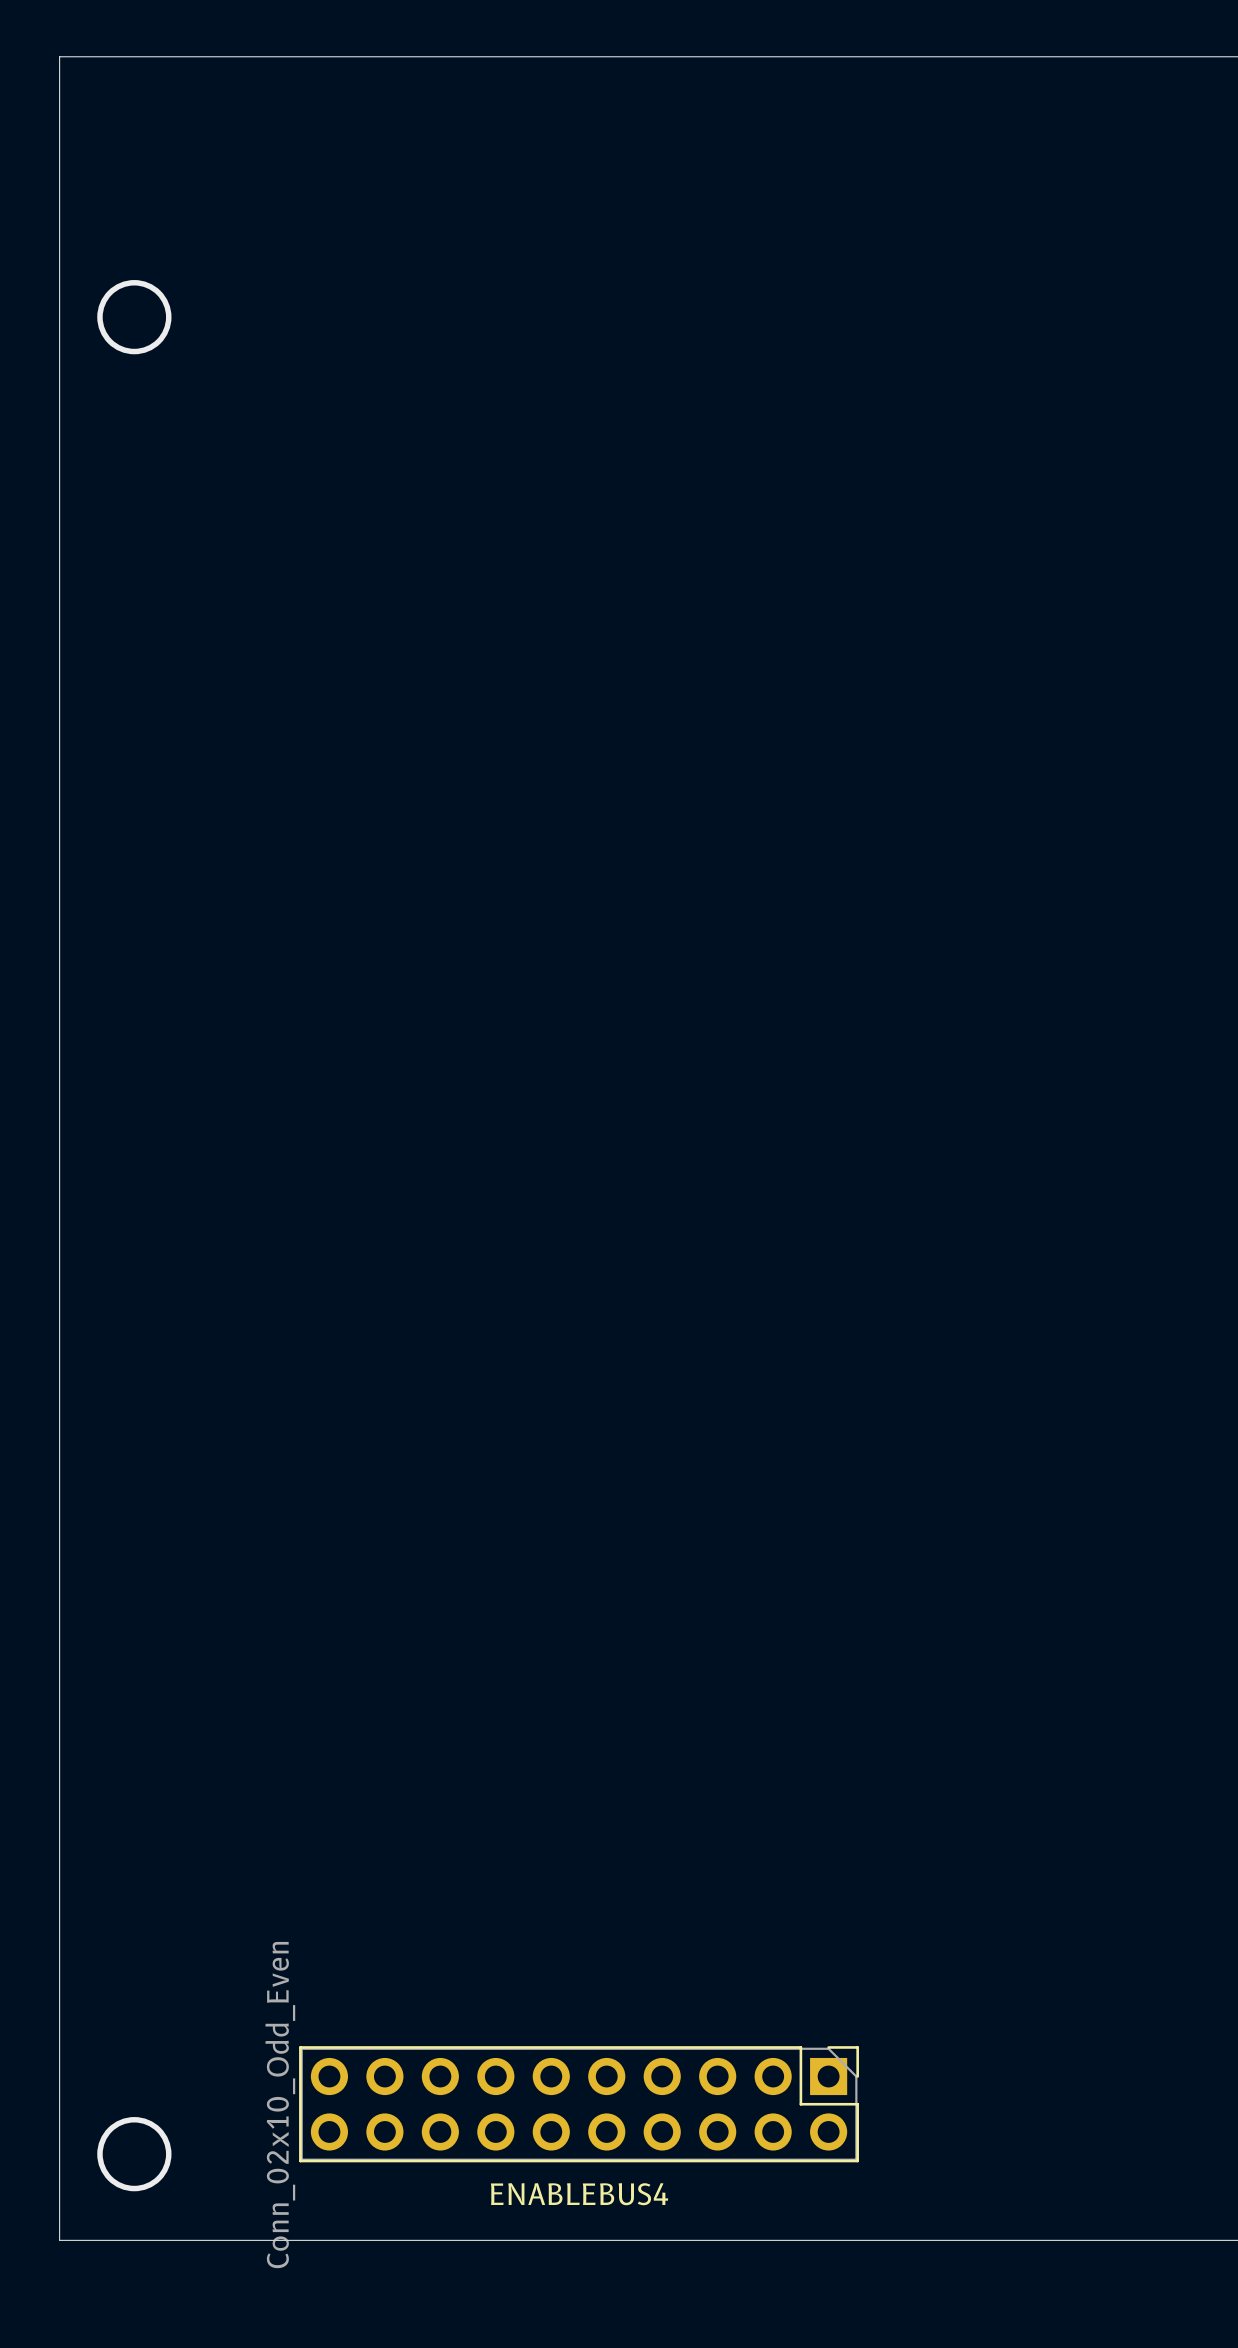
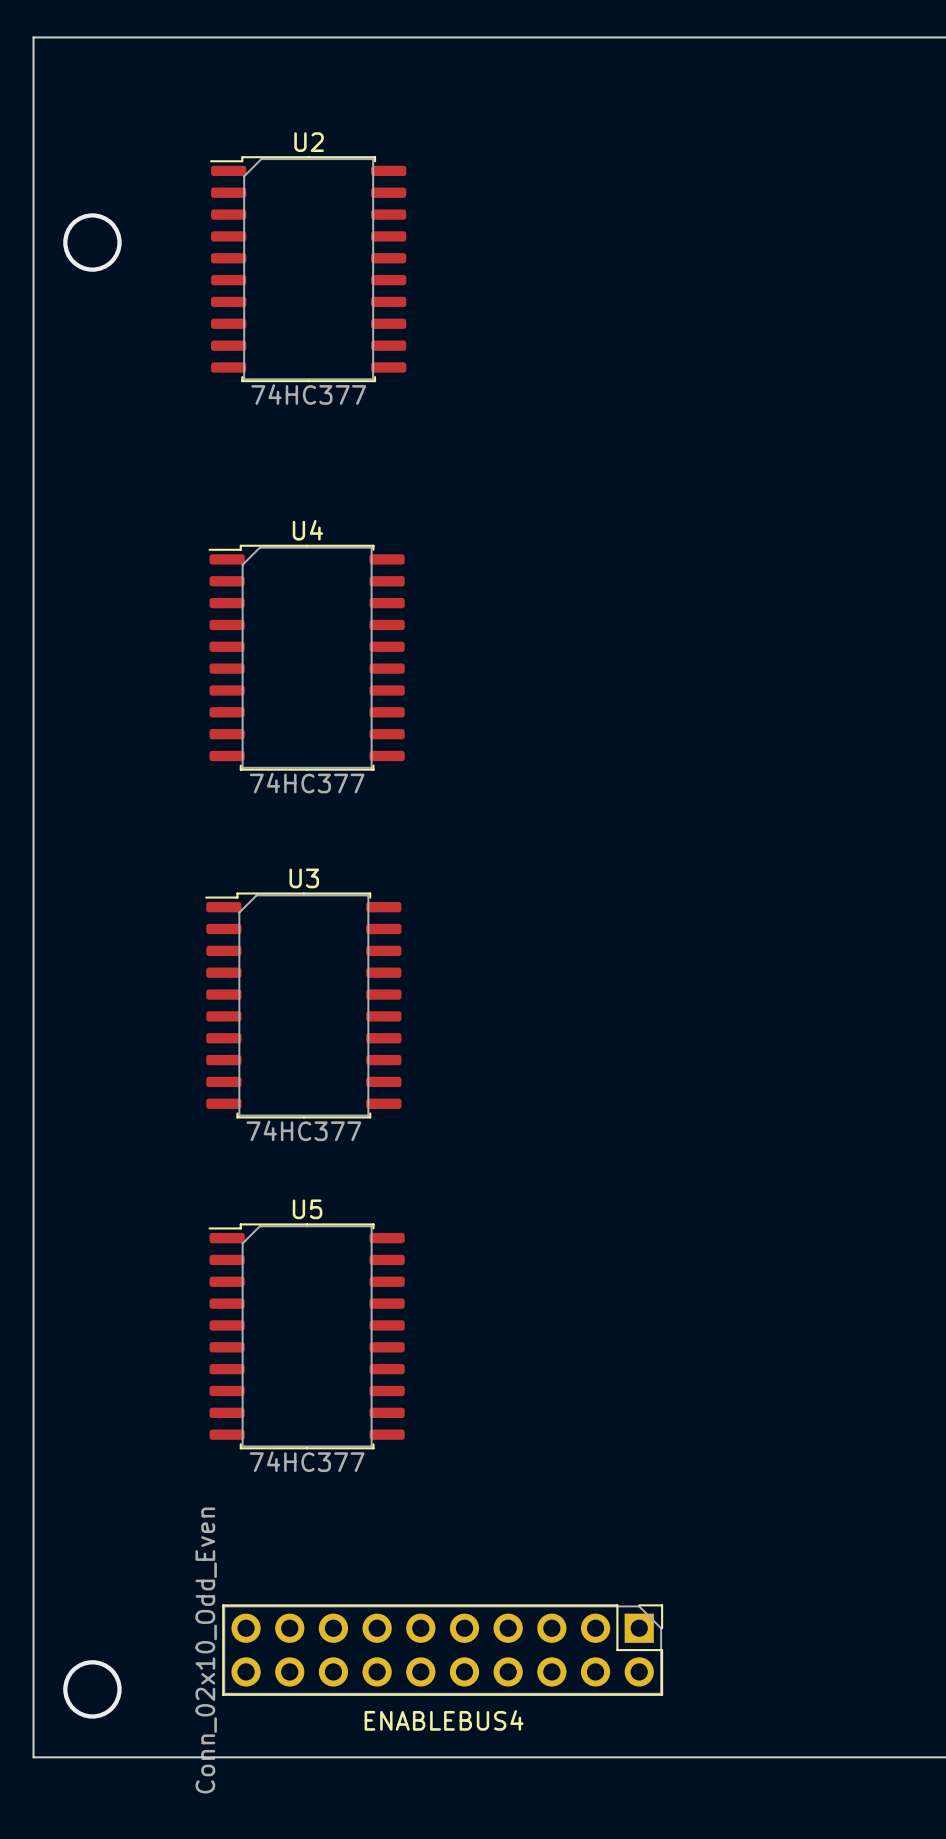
U2: none -> 74HC377 (308, 269)
U4: none -> 74HC377 (306, 657)
U3: none -> 74HC377 (303, 1005)
U5: none -> 74HC377 (306, 1336)

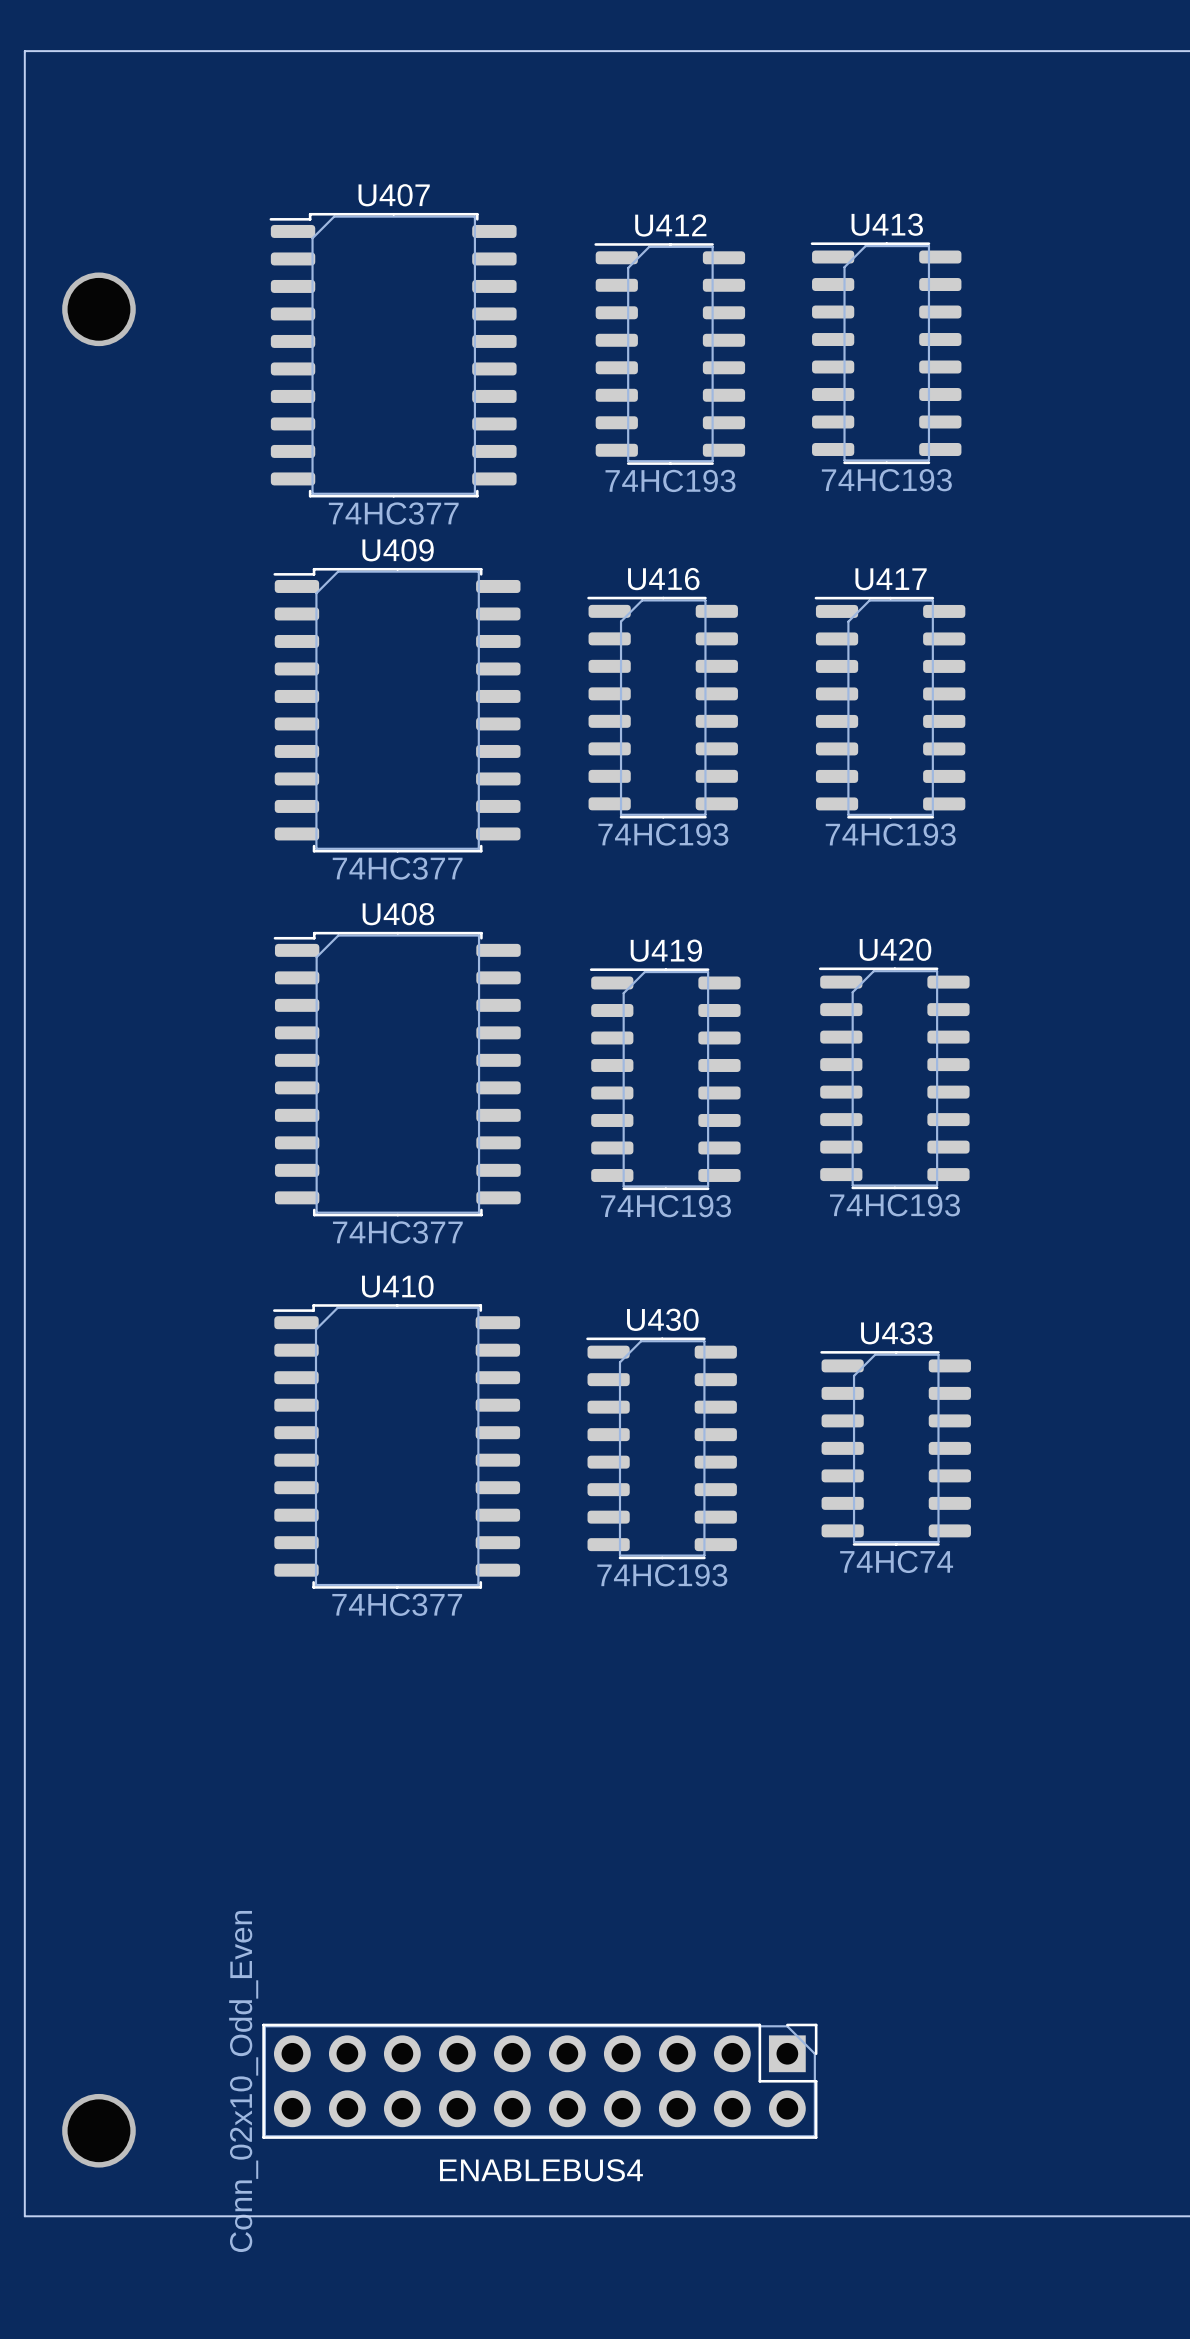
U2: 74HC377 (308, 269) -> none
U413: none -> 74HC193 (886, 353)
U407: none -> 74HC377 (393, 355)
U412: none -> 74HC193 (669, 354)
U416: none -> 74HC193 (662, 707)
U417: none -> 74HC193 (889, 707)
U409: none -> 74HC377 (396, 710)
U4: 74HC377 (306, 657) -> none
U408: none -> 74HC377 (397, 1074)
U420: none -> 74HC193 (894, 1078)
U419: none -> 74HC193 (665, 1079)
U3: 74HC377 (303, 1005) -> none
U410: none -> 74HC377 (396, 1446)
U430: none -> 74HC193 (661, 1448)
U433: none -> 74HC74 (895, 1448)
U5: 74HC377 (306, 1336) -> none

